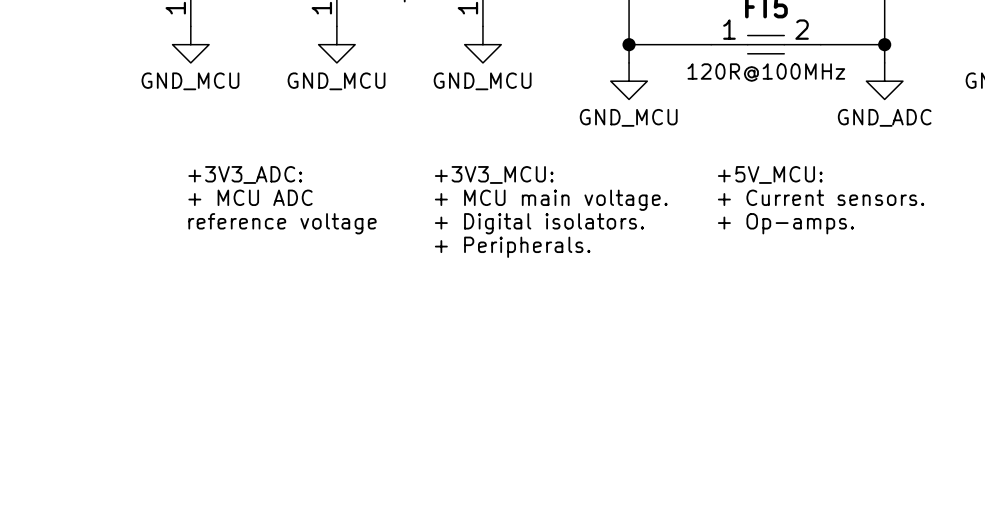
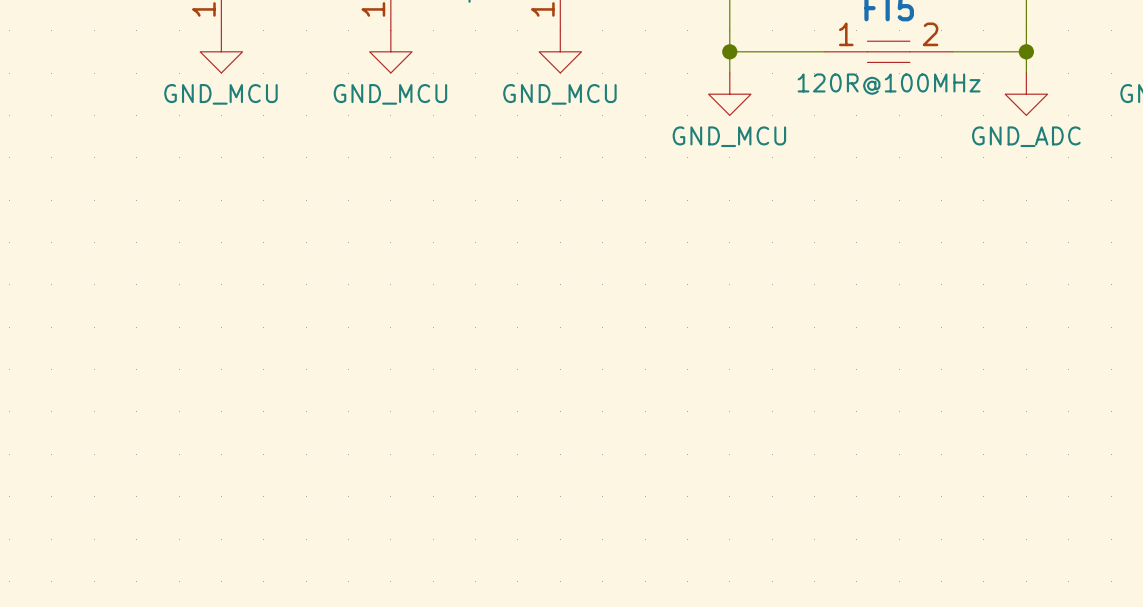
text: +3V3_ADC: (245, 174) -> none
text: +3V3_MCU: (494, 174) -> none
text: +5V_MCU: (770, 174) -> none
text: + MCU ADC (250, 197) -> none
text: + Current sensors. (821, 197) -> none
text: + MCU main voltage. (551, 200) -> none
text: reference voltage (282, 223) -> none
text: + Digital isolators. (539, 223) -> none
text: + Op-amps. (785, 223) -> none
text: + Peripherals. (512, 247) -> none

